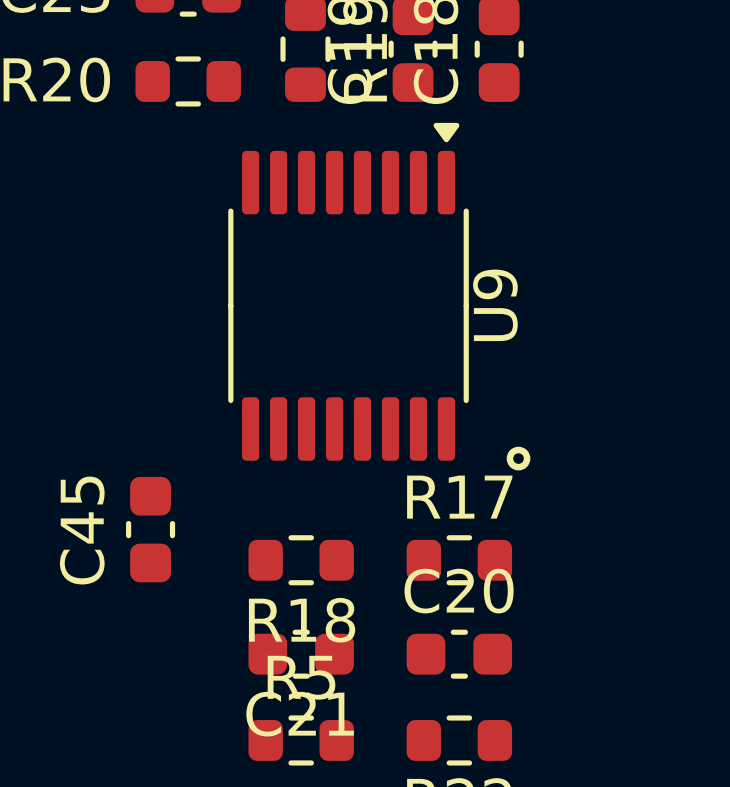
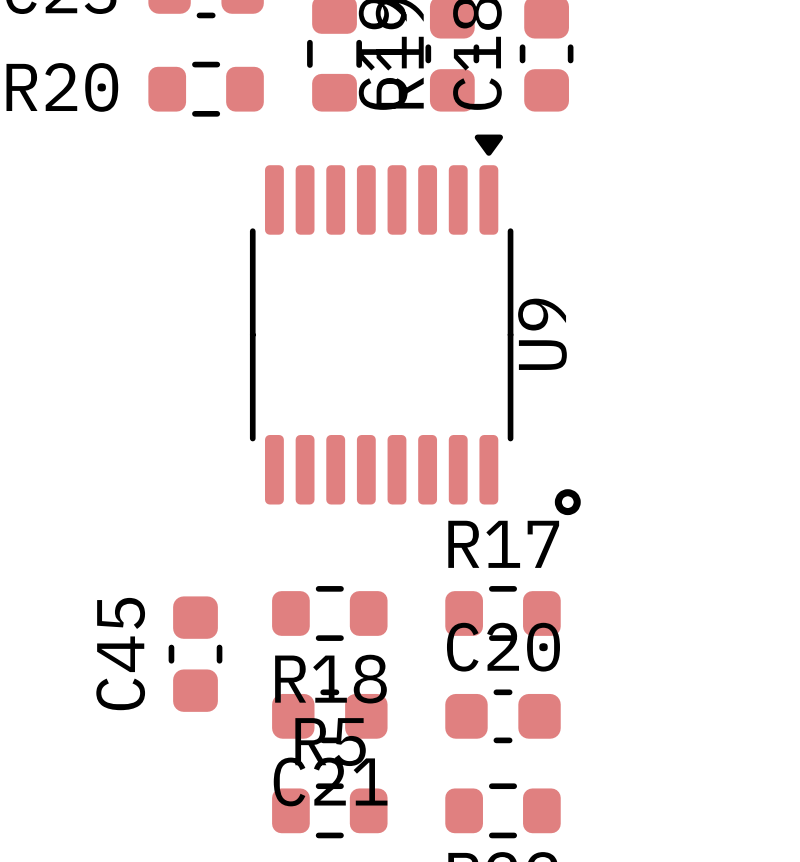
C45 position: (150, 529) -> (195, 654)

